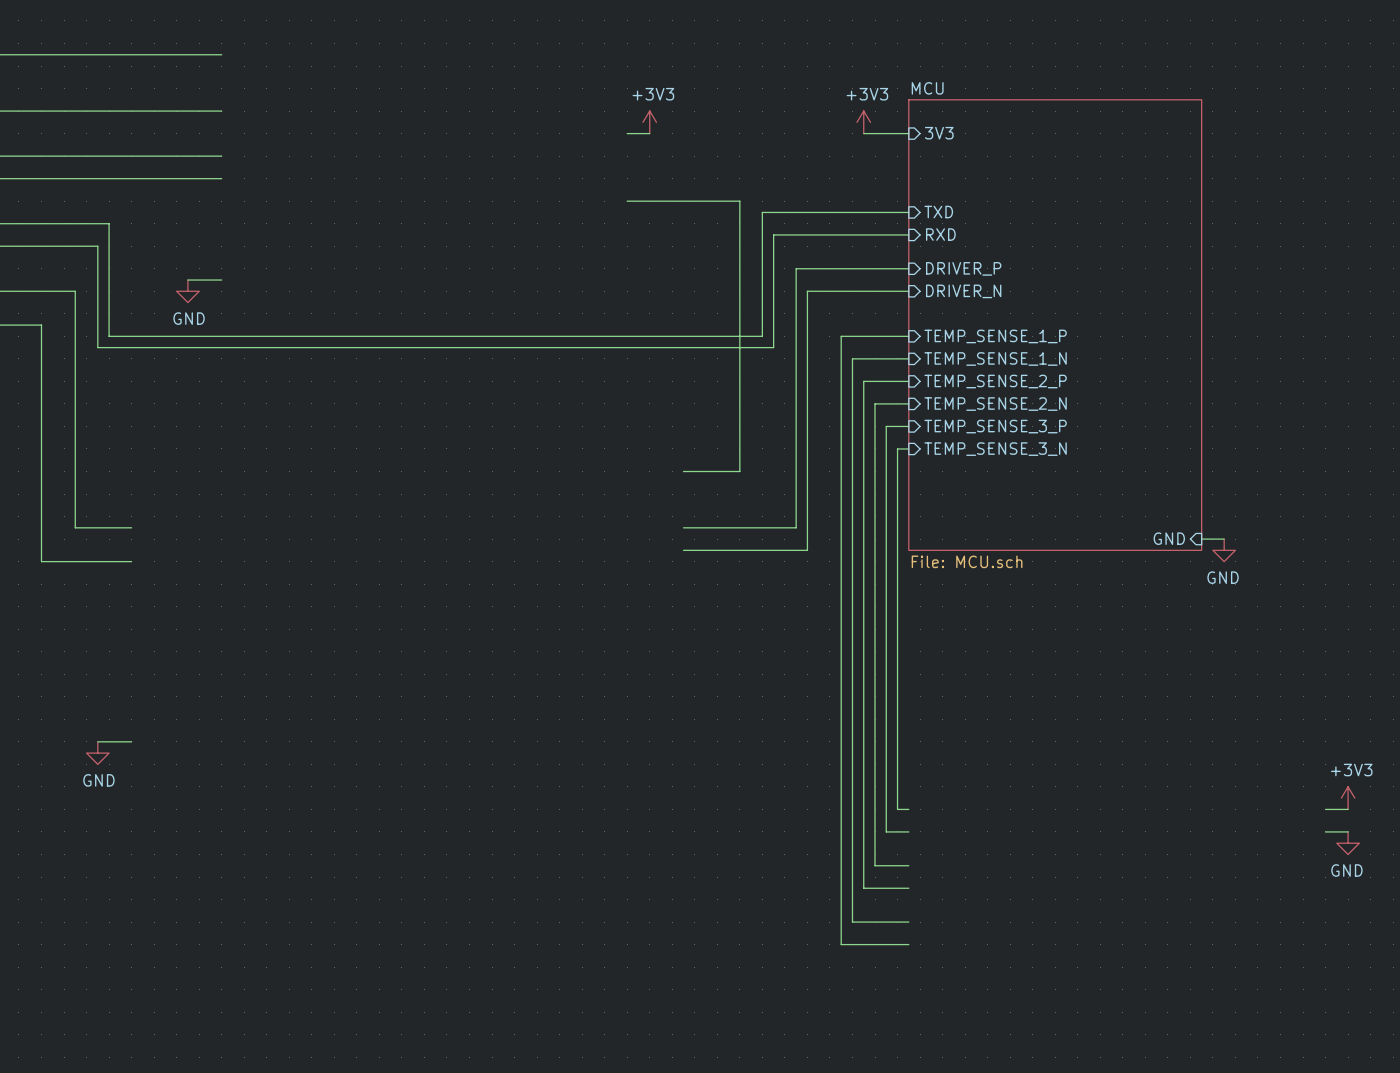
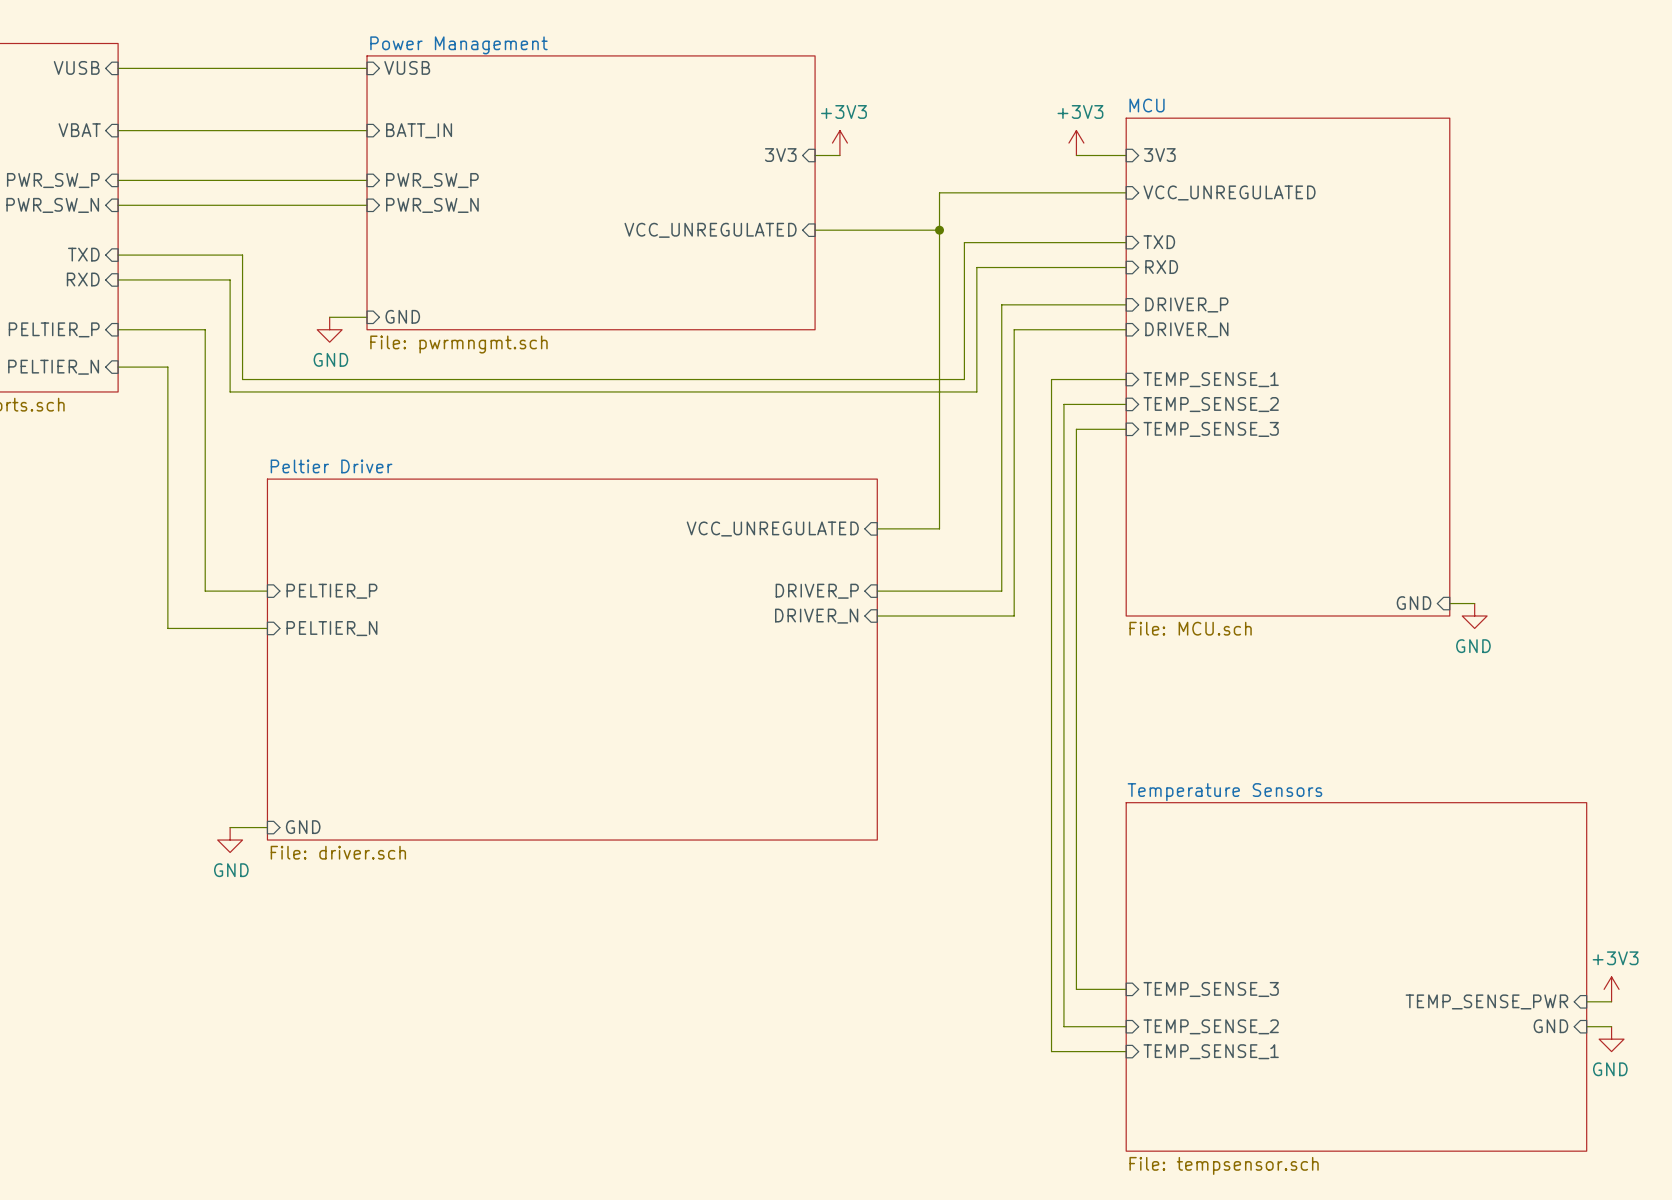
sheet pin: none -> VUSB (407, 67)
sheet pin: none -> BATT_IN (419, 130)
sheet pin: none -> 3V3 (780, 155)
sheet pin: none -> PWR_SW_P (432, 180)
sheet Power Management: none -> File: pwrmngmt.sch (591, 192)
wire: none -> (1126, 192) (939, 192) (939, 230)
sheet pin: none -> VCC_UNREGULATED (1229, 192)
sheet pin: none -> PWR_SW_N (432, 205)
sheet pin: none -> VCC_UNREGULATED (710, 230)
junction: none -> (939, 230)
sheet pin: none -> GND (402, 316)
sheet pin: TEMP_SENSE_1_P (995, 336) -> TEMP_SENSE_1 (1211, 379)
sheet pin: TEMP_SENSE_1_N (995, 358) -> TEMP_SENSE_2 (1211, 404)
sheet pin: TEMP_SENSE_2_P (995, 381) -> TEMP_SENSE_3 (1211, 429)
wire: (908, 403) (875, 403) (875, 865) (908, 865) -> none
sheet pin: TEMP_SENSE_2_N (995, 404) -> none
wire: (908, 426) (886, 426) (886, 831) (908, 831) -> none
sheet pin: TEMP_SENSE_3_P (995, 426) -> none
wire: (908, 448) (897, 448) (897, 809) (908, 809) -> none
sheet pin: TEMP_SENSE_3_N (995, 449) -> none
sheet pin: none -> VCC_UNREGULATED (772, 529)
sheet pin: none -> PELTIER_P (331, 591)
sheet pin: none -> DRIVER_P (817, 591)
sheet pin: none -> DRIVER_N (816, 616)
sheet pin: none -> PELTIER_N (331, 628)
sheet Peltier Driver: none -> File: driver.sch (572, 659)
sheet pin: none -> GND (303, 827)
power symbol position: +3V3 (1348, 798) -> +3V3 (1611, 989)
wire: (1325, 809) (1348, 809) -> (1586, 1001) (1611, 1001)
wire: (1325, 831) (1348, 831) -> (1586, 1026) (1611, 1026)
power symbol position: GND (1348, 843) -> GND (1611, 1039)
sheet Temperature Sensors: none -> File: tempsensor.sch (1356, 976)
sheet pin: none -> TEMP_SENSE_3 (1211, 989)
sheet pin: none -> TEMP_SENSE_PWR (1486, 1001)
sheet pin: none -> GND (1550, 1026)
sheet pin: none -> TEMP_SENSE_2 (1211, 1026)
sheet pin: none -> TEMP_SENSE_1 (1211, 1051)

